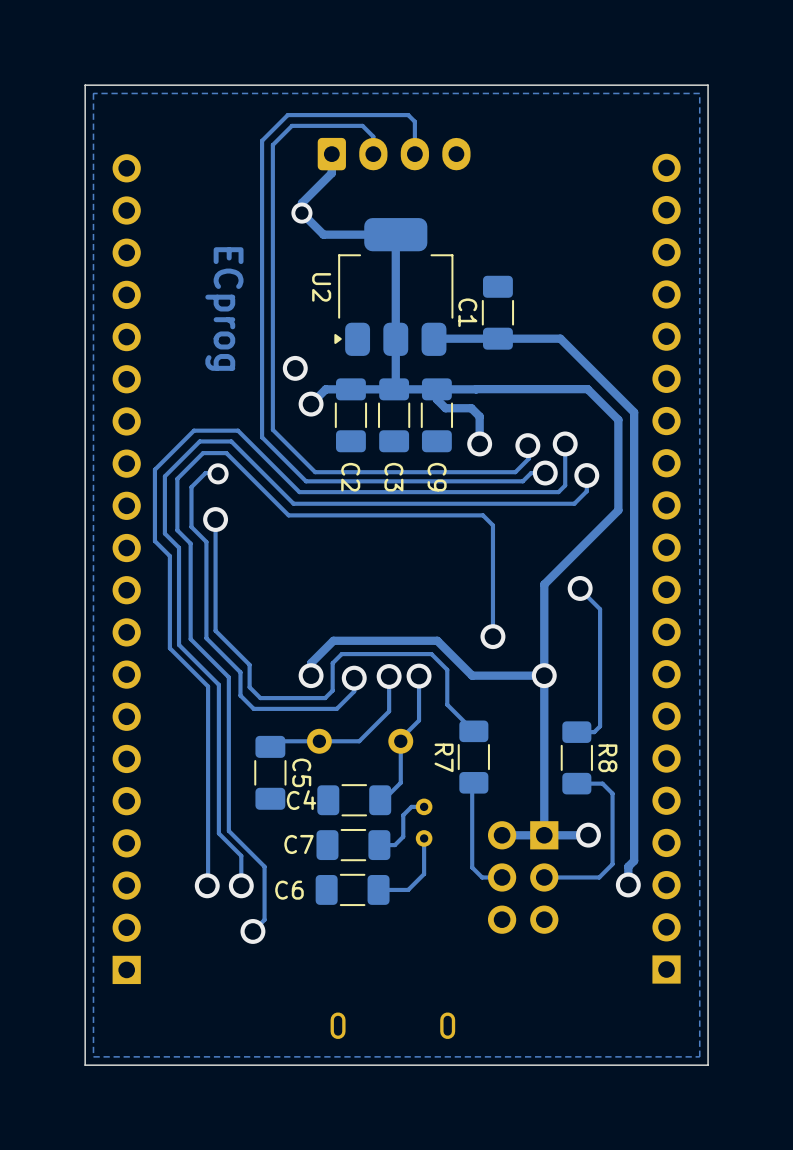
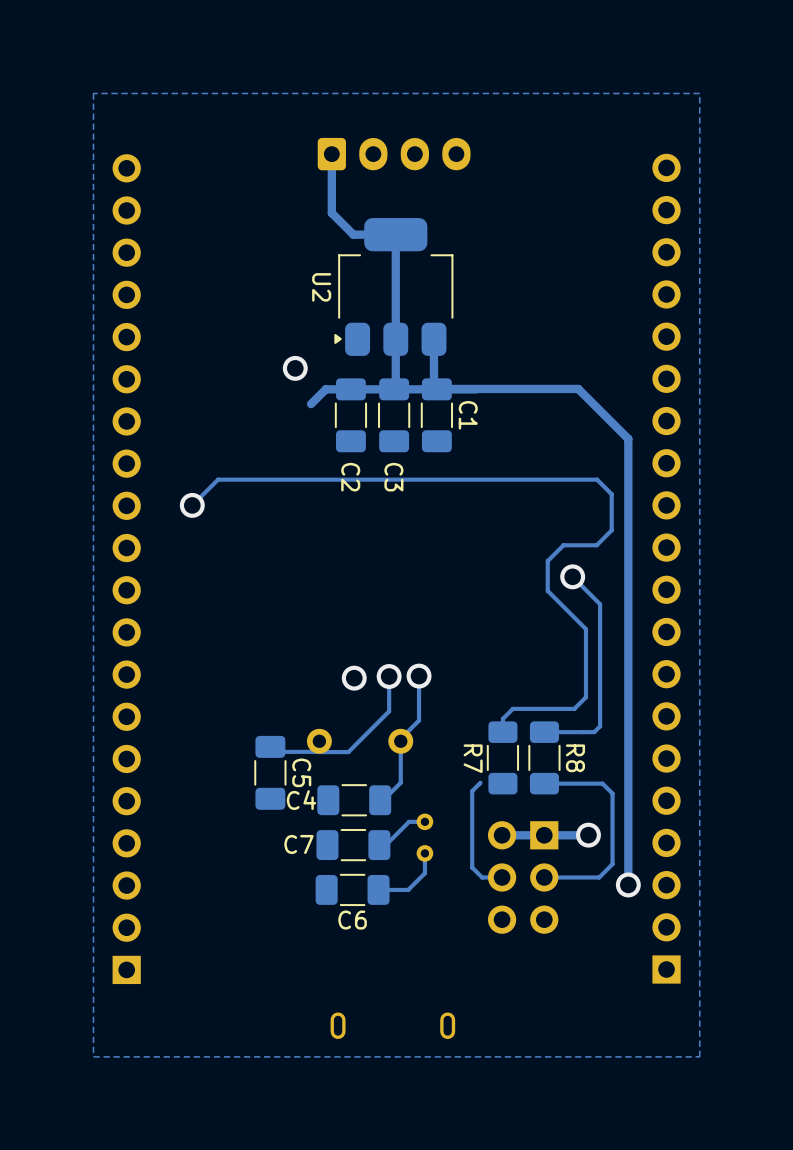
board edge: (708, 85) (85, 85) (85, 1065) (708, 1065) (708, 85) -> none
track: (373, 154) (373, 136) (362, 125) (291, 125) (272, 144) (272, 429) (315, 472) (515, 472) (528, 458) (527, 445) -> none
track: (414, 154) (414, 121) (408, 115) (287, 115) (262, 140) (262, 437) (306, 481) (522, 481) (531, 473) (545, 473) -> none
track: (331, 173) (301, 203) (301, 213) (323, 234) (353, 234) -> (331, 173) (331, 213) (353, 234)
via: (301, 213) -> none
text: ECprog (224, 309) -> none
C1: (497, 312) -> none
track: (433, 339) (560, 338) (634, 412) (634, 860) (628, 866) -> (433, 339) (433, 387) (435, 388) (578, 388) (628, 438) (628, 866)
track: (441, 384) (436, 389) (436, 399) (445, 408) (471, 408) (479, 416) (479, 443) -> none
track: (476, 389) (587, 389) (618, 419) (618, 510) (544, 584) (544, 835) -> none
via: (311, 404) -> none
via: (479, 443) -> none
track: (565, 443) (565, 485) (558, 492) (299, 492) (237, 430) (193, 430) (154, 469) (154, 541) (169, 556) (169, 648) (208, 686) (207, 885) -> none
via: (565, 443) -> none
via: (527, 445) -> none
track: (218, 473) (205, 473) (191, 487) (191, 527) (206, 541) (206, 638) (240, 672) (240, 695) (253, 708) (336, 708) (354, 691) (354, 678) -> none
via: (218, 473) -> none
via: (545, 473) -> none
track: (586, 475) (586, 491) (574, 503) (293, 503) (231, 441) (199, 441) (164, 476) (164, 533) (179, 547) (179, 644) (218, 684) (218, 833) (241, 855) (241, 885) -> none
via: (586, 475) -> none
C9 name: C9 (437, 477) -> C1 (468, 415)
track: none -> (192, 505) (218, 479) (597, 479) (611, 494) (611, 530) (596, 545) (563, 545) (547, 561) (547, 590) (585, 629) (585, 697) (574, 708) (512, 708) (502, 718) (502, 732)
track: (215, 519) (215, 630) (249, 664) (249, 687) (260, 698) (325, 698) (332, 690) (332, 663) (341, 654) (431, 654) (447, 669) (447, 704) (473, 731) -> none
via position: (215, 519) -> (192, 505)
track: (580, 588) (600, 609) -> (572, 576) (600, 604) (600, 609)
via position: (580, 588) -> (572, 576)
track: (492, 636) (492, 525) (482, 515) (288, 515) (226, 453) (203, 453) (177, 478) (177, 530) (190, 543) (190, 639) (228, 677) (228, 830) (264, 866) (264, 919) (252, 931) -> none
via: (492, 636) -> none
via: (311, 675) -> none
track: (544, 675) (472, 675) (437, 640) (333, 640) (311, 663) (311, 675) -> none
via: (544, 675) -> none
track: none -> (576, 732) (544, 732)
track: (359, 741) (280, 741) (270, 751) -> (319, 751) (270, 751)
track: none -> (359, 741) (348, 752) (319, 752)
R7 position: (473, 757) -> (502, 757)
R8 position: (576, 757) -> (544, 757)
track: none -> (576, 783) (544, 783)
track: (424, 806) (411, 806) (403, 815) (403, 836) (394, 845) (385, 845) -> (424, 821) (409, 821) (385, 845)
part position: (424, 822) -> (424, 837)
track: (424, 838) (424, 874) -> (424, 853) (424, 874)
via: (207, 885) -> none
via: (241, 885) -> none
C6 name position: C6 (289, 890) -> C6 (352, 920)
via: (252, 931) -> none

